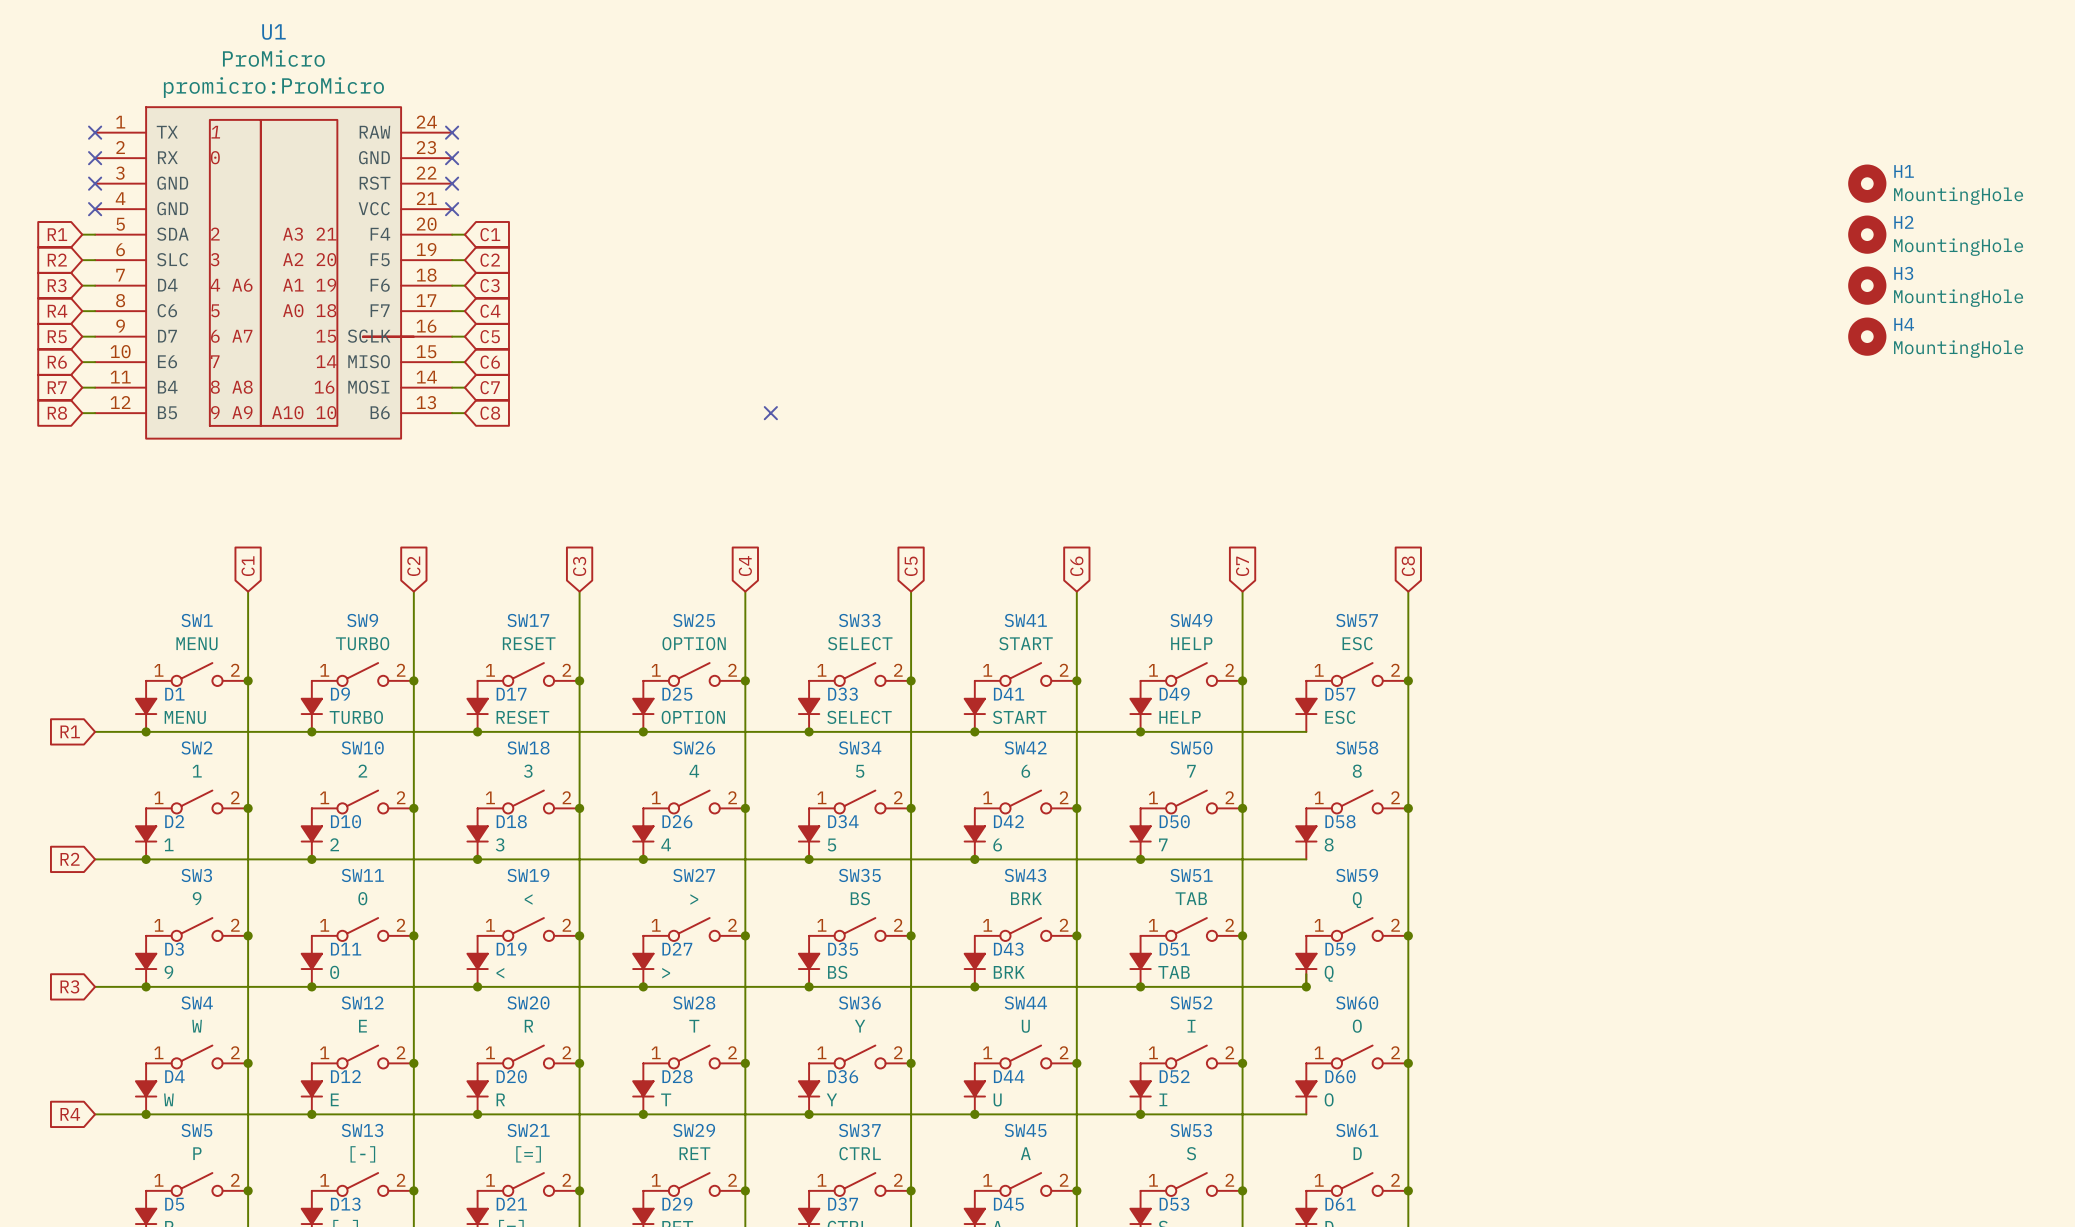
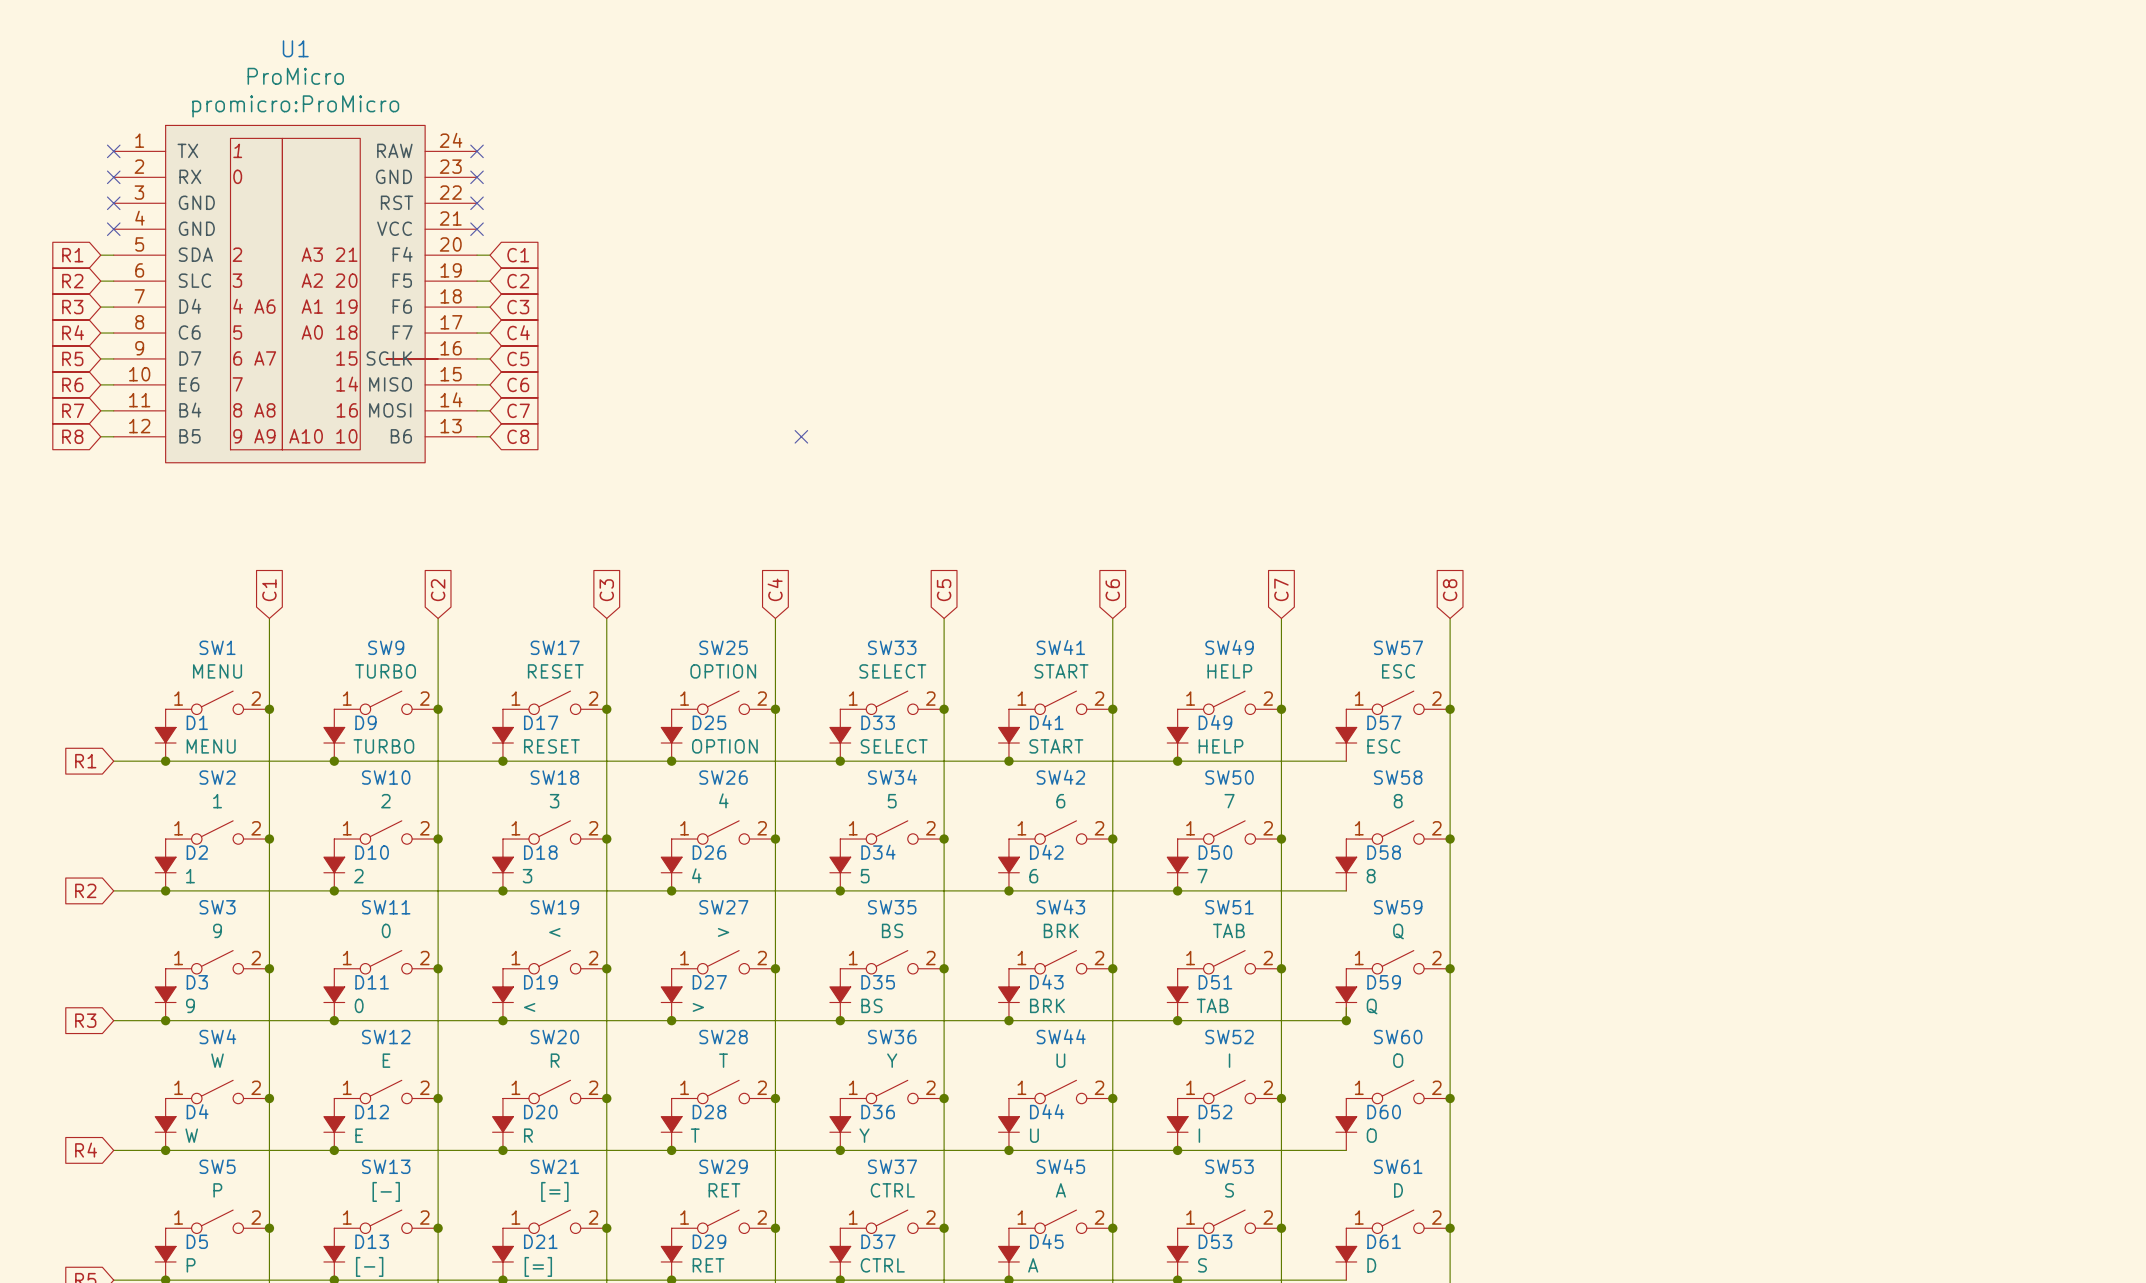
H1: MountingHole (1867, 183) -> none
H2: MountingHole (1867, 234) -> none
H3: MountingHole (1867, 285) -> none
H4: MountingHole (1867, 336) -> none

